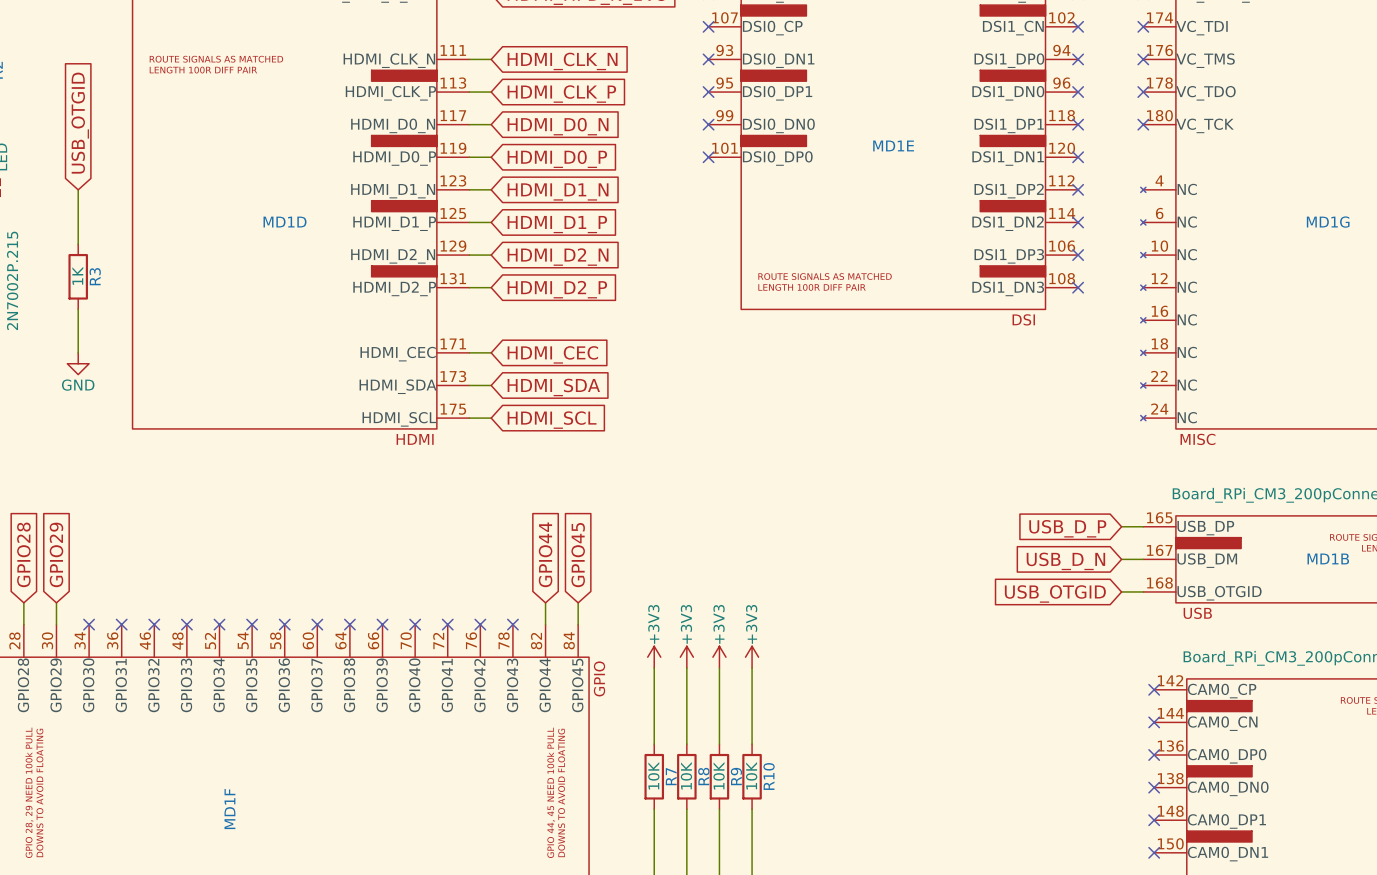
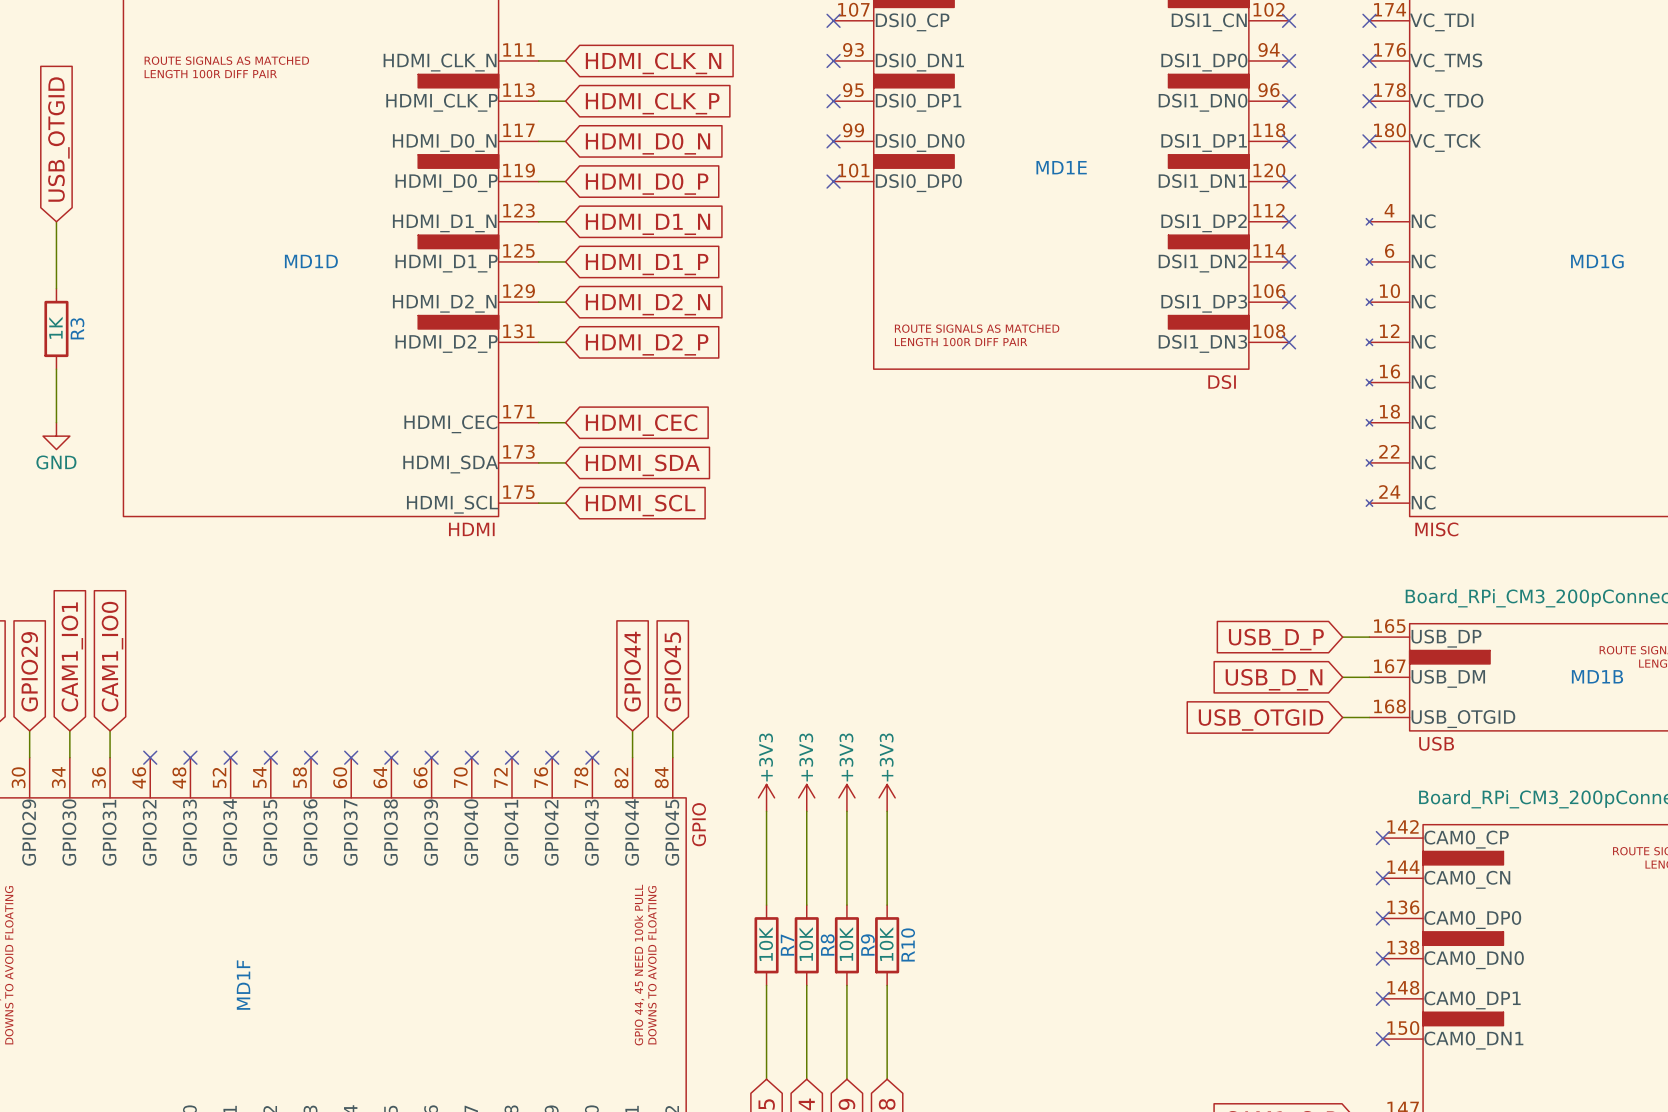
global label: none -> CAM1_IO1 (72, 656)
global label: none -> CAM1_IO0 (112, 656)
wire: none -> (69, 730) (69, 757)
wire: none -> (110, 730) (110, 757)
no-connect mark: (89, 624) -> none
no-connect mark: (121, 624) -> none

